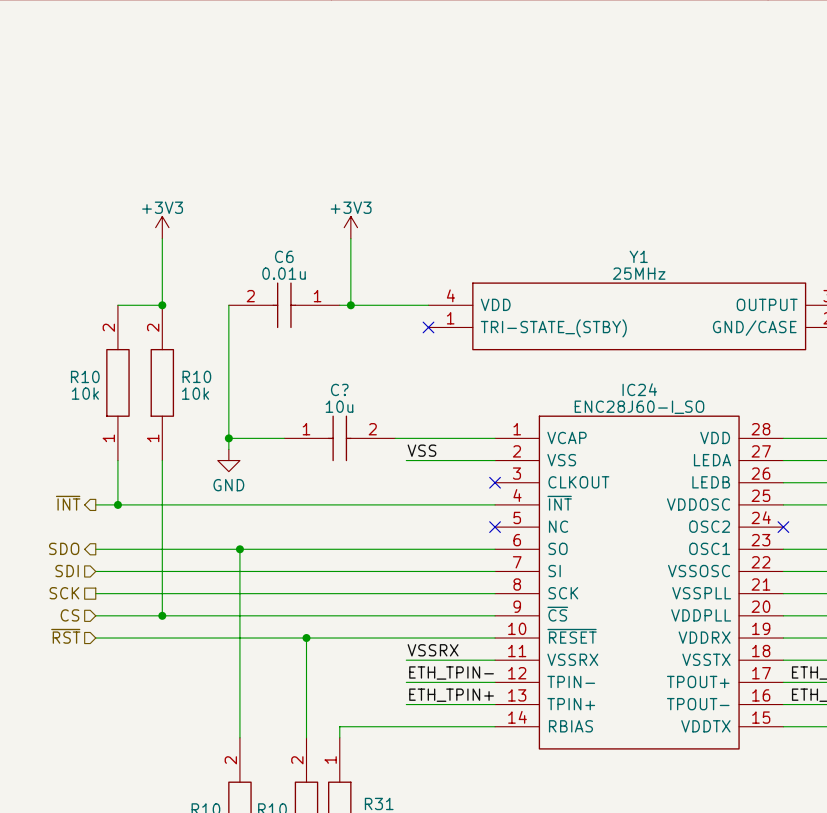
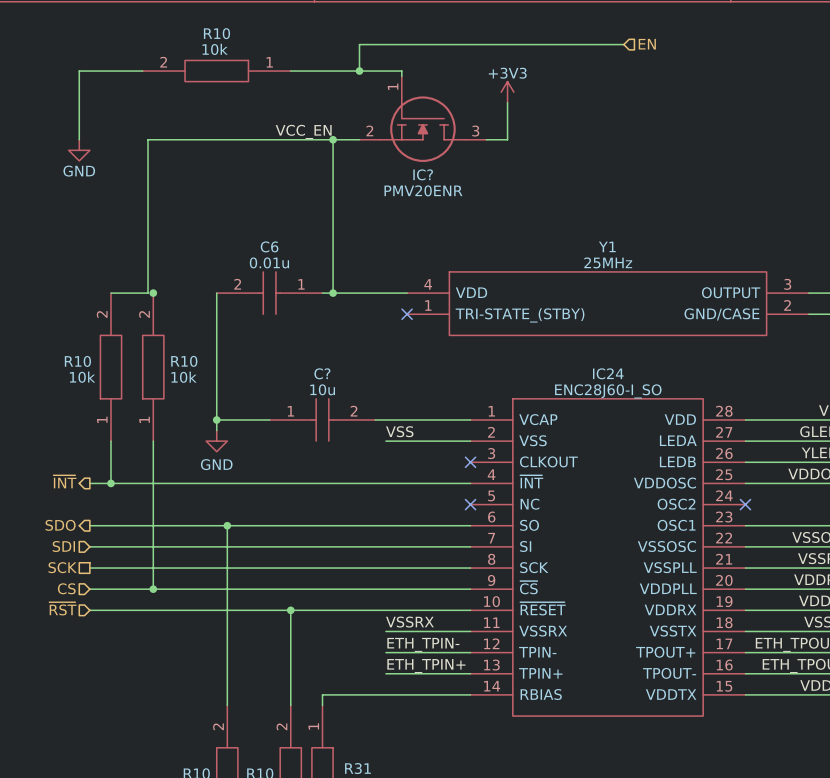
wire: none -> (623, 44) (359, 44) (359, 71)
hierarchical label: none -> EN (647, 44)
wire: none -> (142, 71) (79, 71) (79, 139)
R10: none -> 10k (216, 71)
wire: none -> (290, 71) (401, 71) (401, 76)
junction: none -> (359, 71)
power symbol: none -> +3V3 (507, 92)
wire: none -> (507, 102) (507, 139) (486, 139)
IC?: none -> PMV20ENR (422, 119)
label: none -> VCC_EN (303, 131)
wire: none -> (333, 139) (333, 229)
junction: none -> (333, 139)
power symbol: none -> GND (79, 150)
power symbol: +3V3 (162, 227) -> none
power symbol: +3V3 (350, 227) -> none
wire: (162, 238) (162, 305) (156, 305) -> (359, 139) (148, 139) (148, 293)

